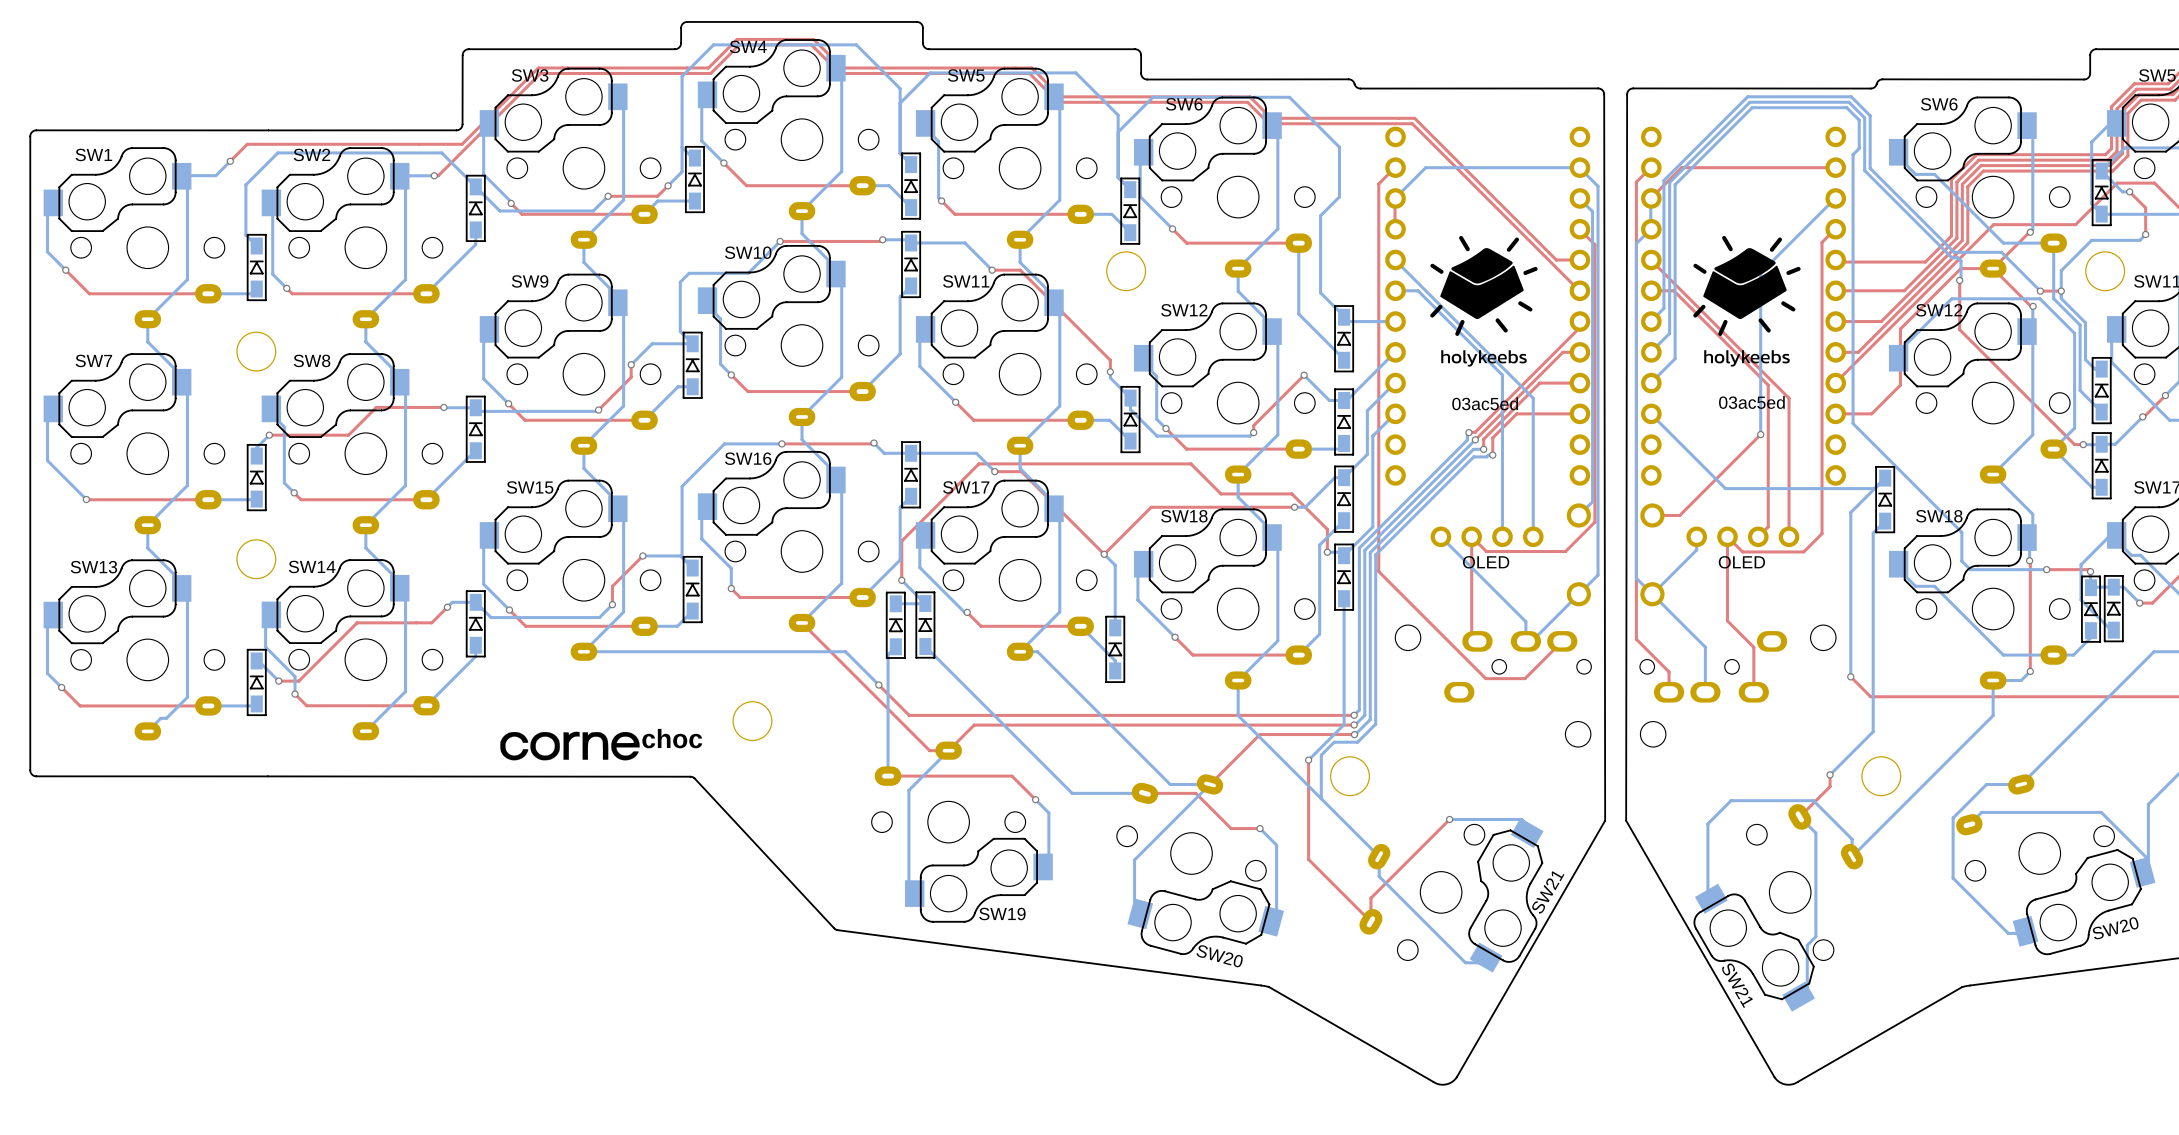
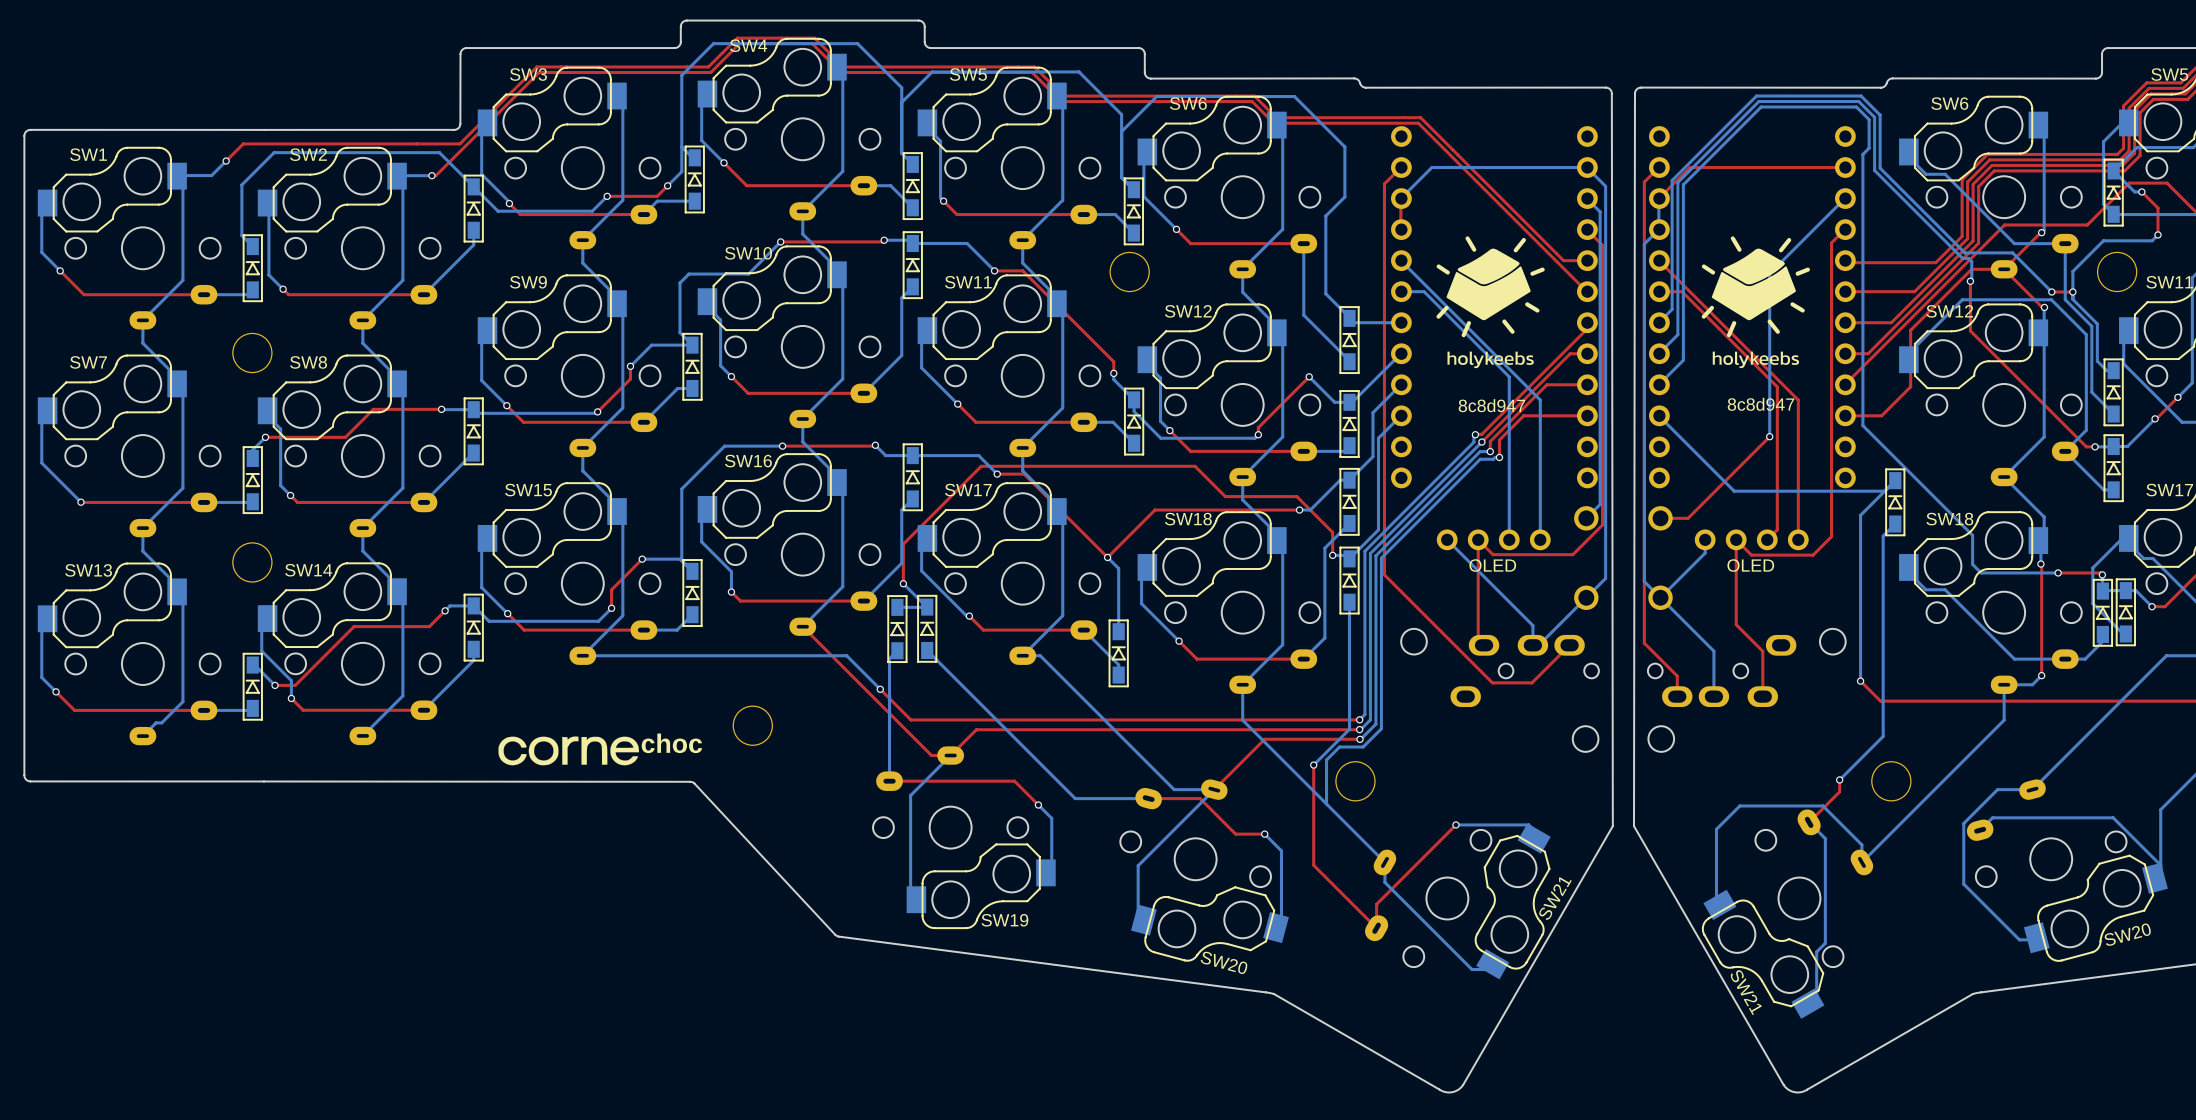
text: 03ac5ed (1751, 402) -> 8c8d947 (1761, 404)
text: 03ac5ed (1485, 403) -> 8c8d947 (1491, 405)

